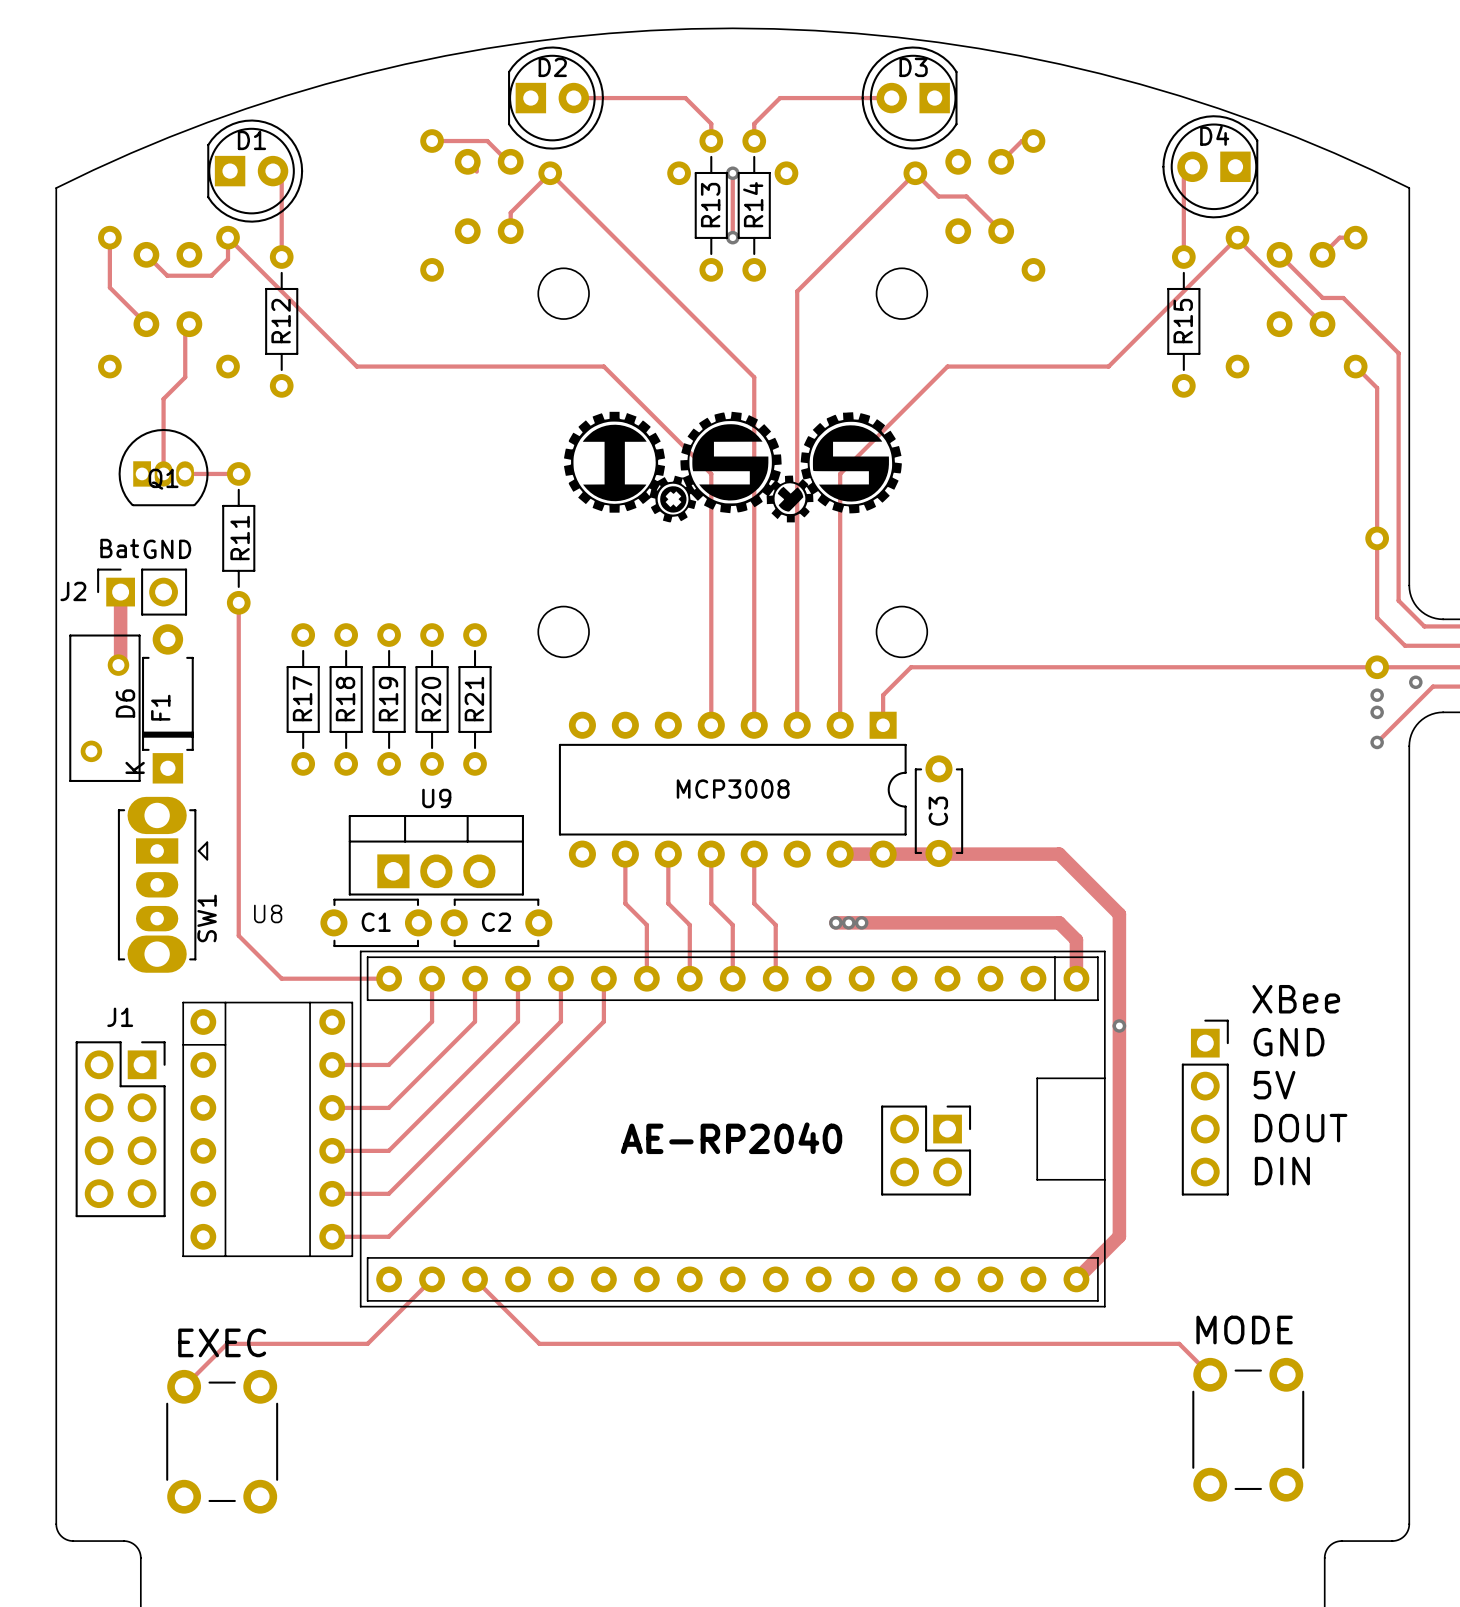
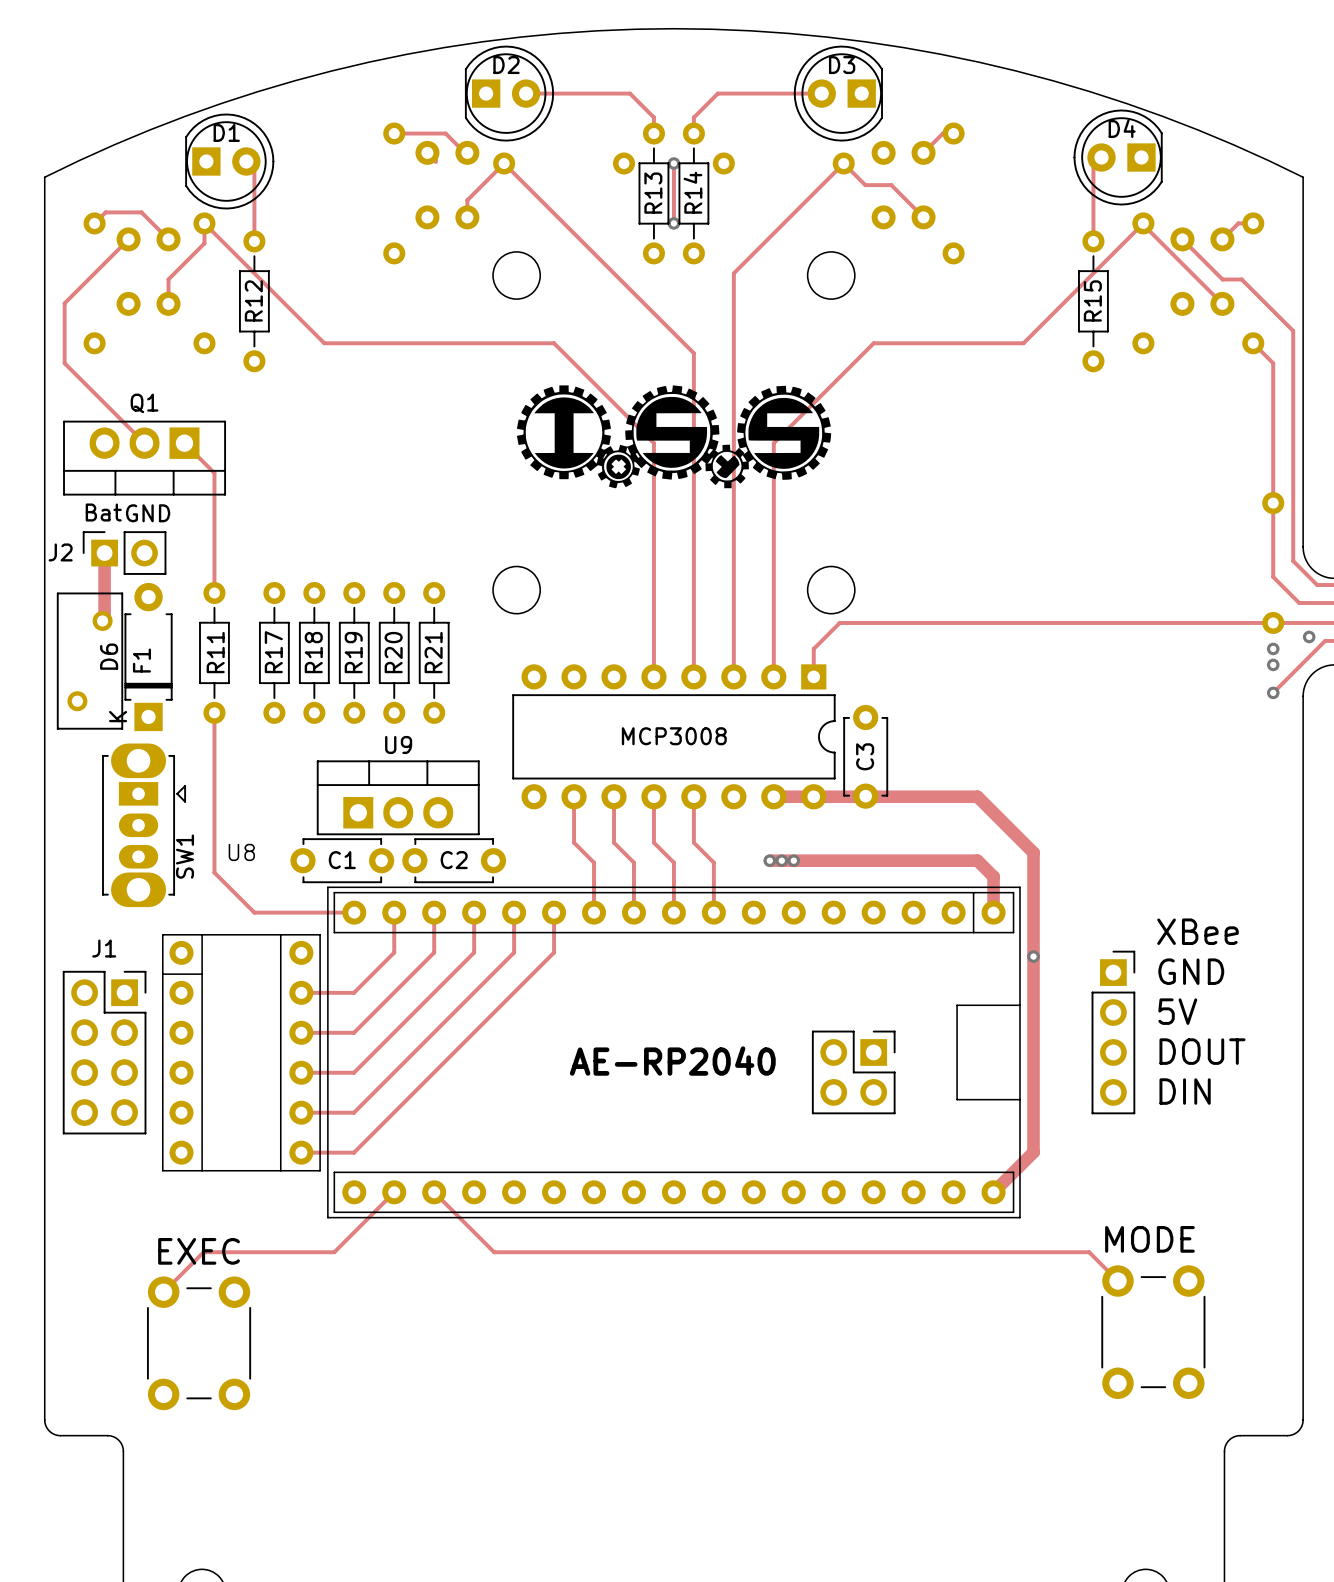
track: (109, 237) (109, 287) (146, 324) -> (94, 223) (105, 212) (141, 212) (168, 239)
track: (146, 254) (167, 275) (211, 275) -> (168, 303) (168, 279) (189, 258)
track: (185, 328) (185, 377) (163, 398) (163, 473) -> (128, 239) (64, 303) (64, 363) (144, 443)
Q1 footprint: [118, 428, 209, 507] -> [63, 420, 227, 496]
track: (185, 473) (238, 473) -> none
track: none -> (184, 443) (214, 473) (214, 563)
Q1 name position: Q1 (163, 479) -> Q1 (144, 403)
R11 position: (238, 538) -> (214, 652)
track: (238, 635) (238, 763) -> none

